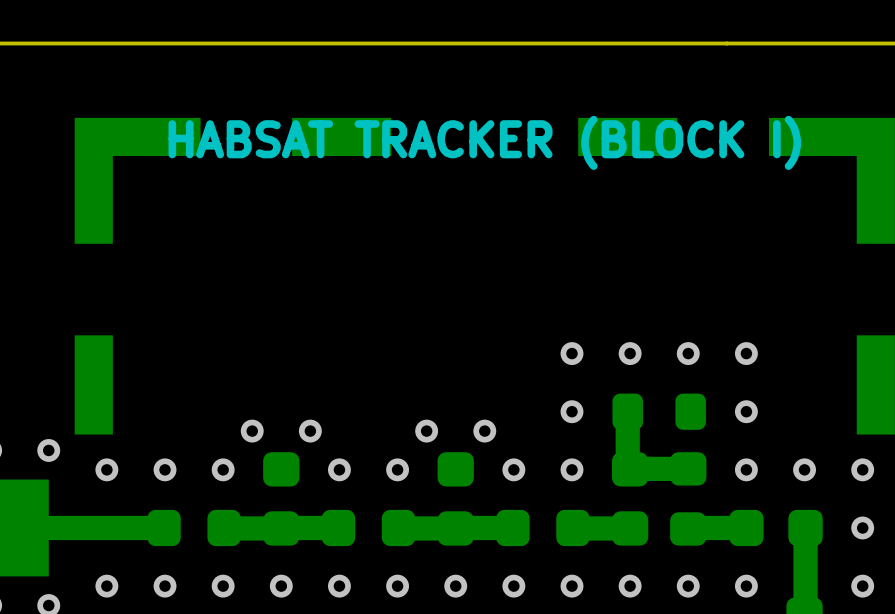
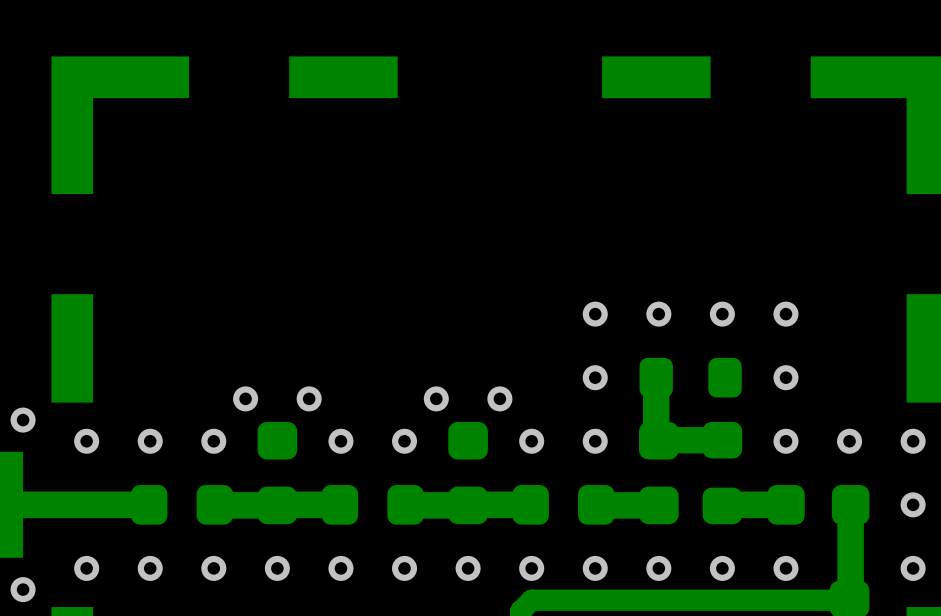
text: HABSAT TRACKER (BLOCK I) (484, 142) -> none

